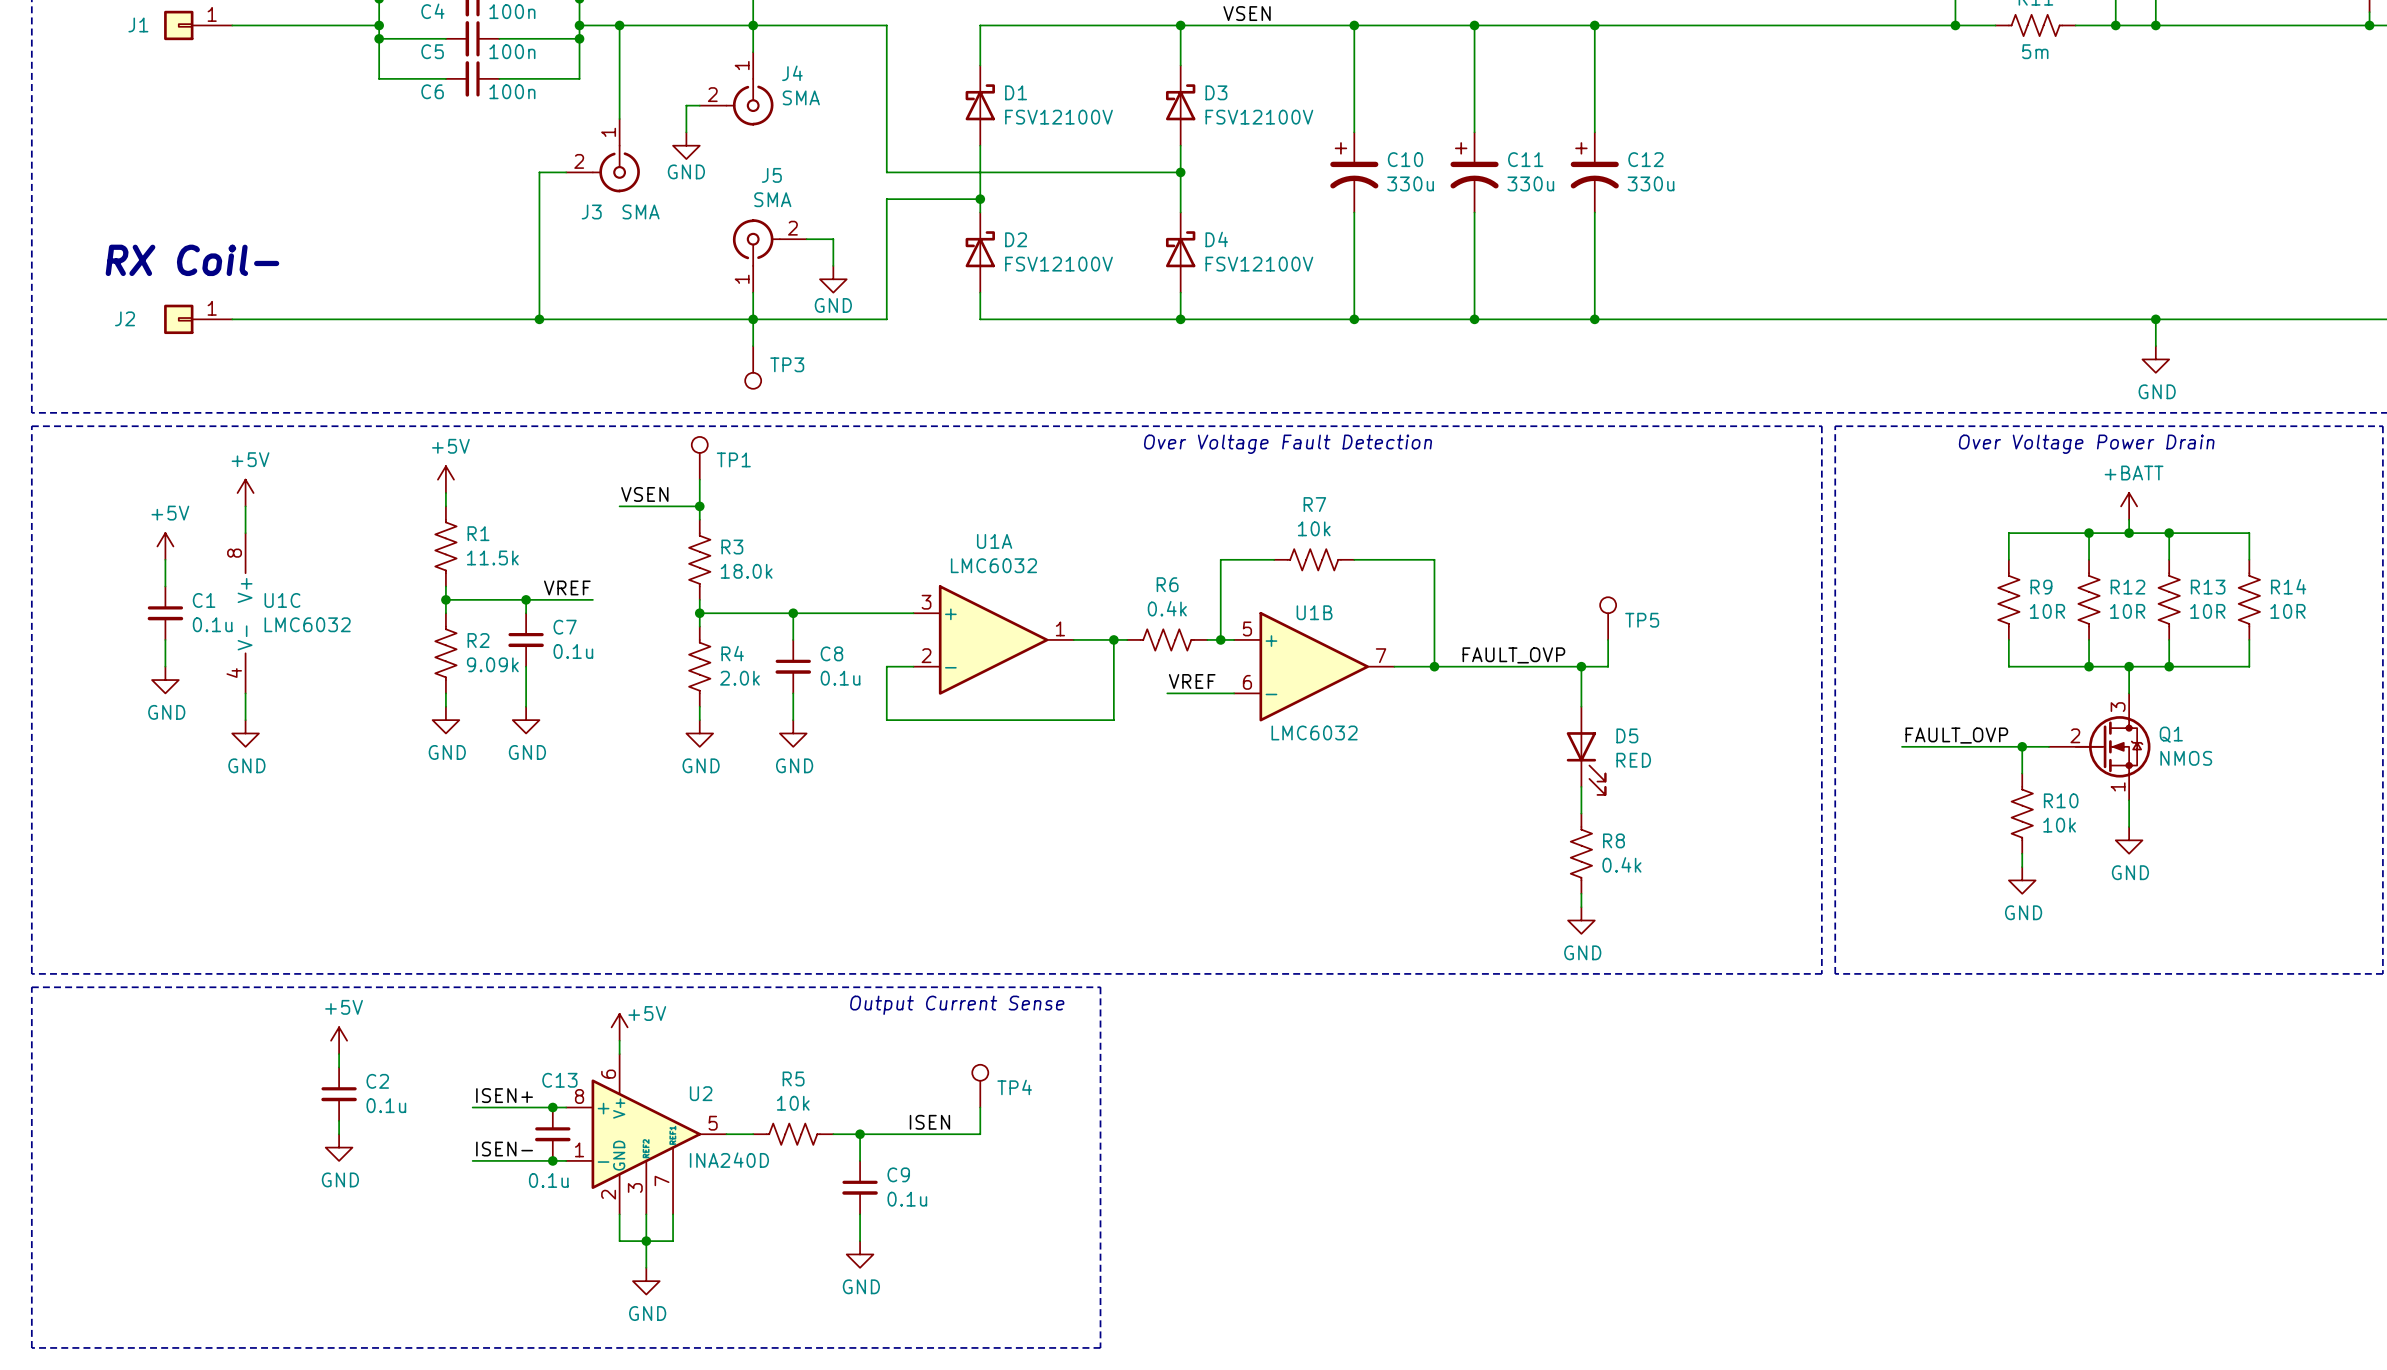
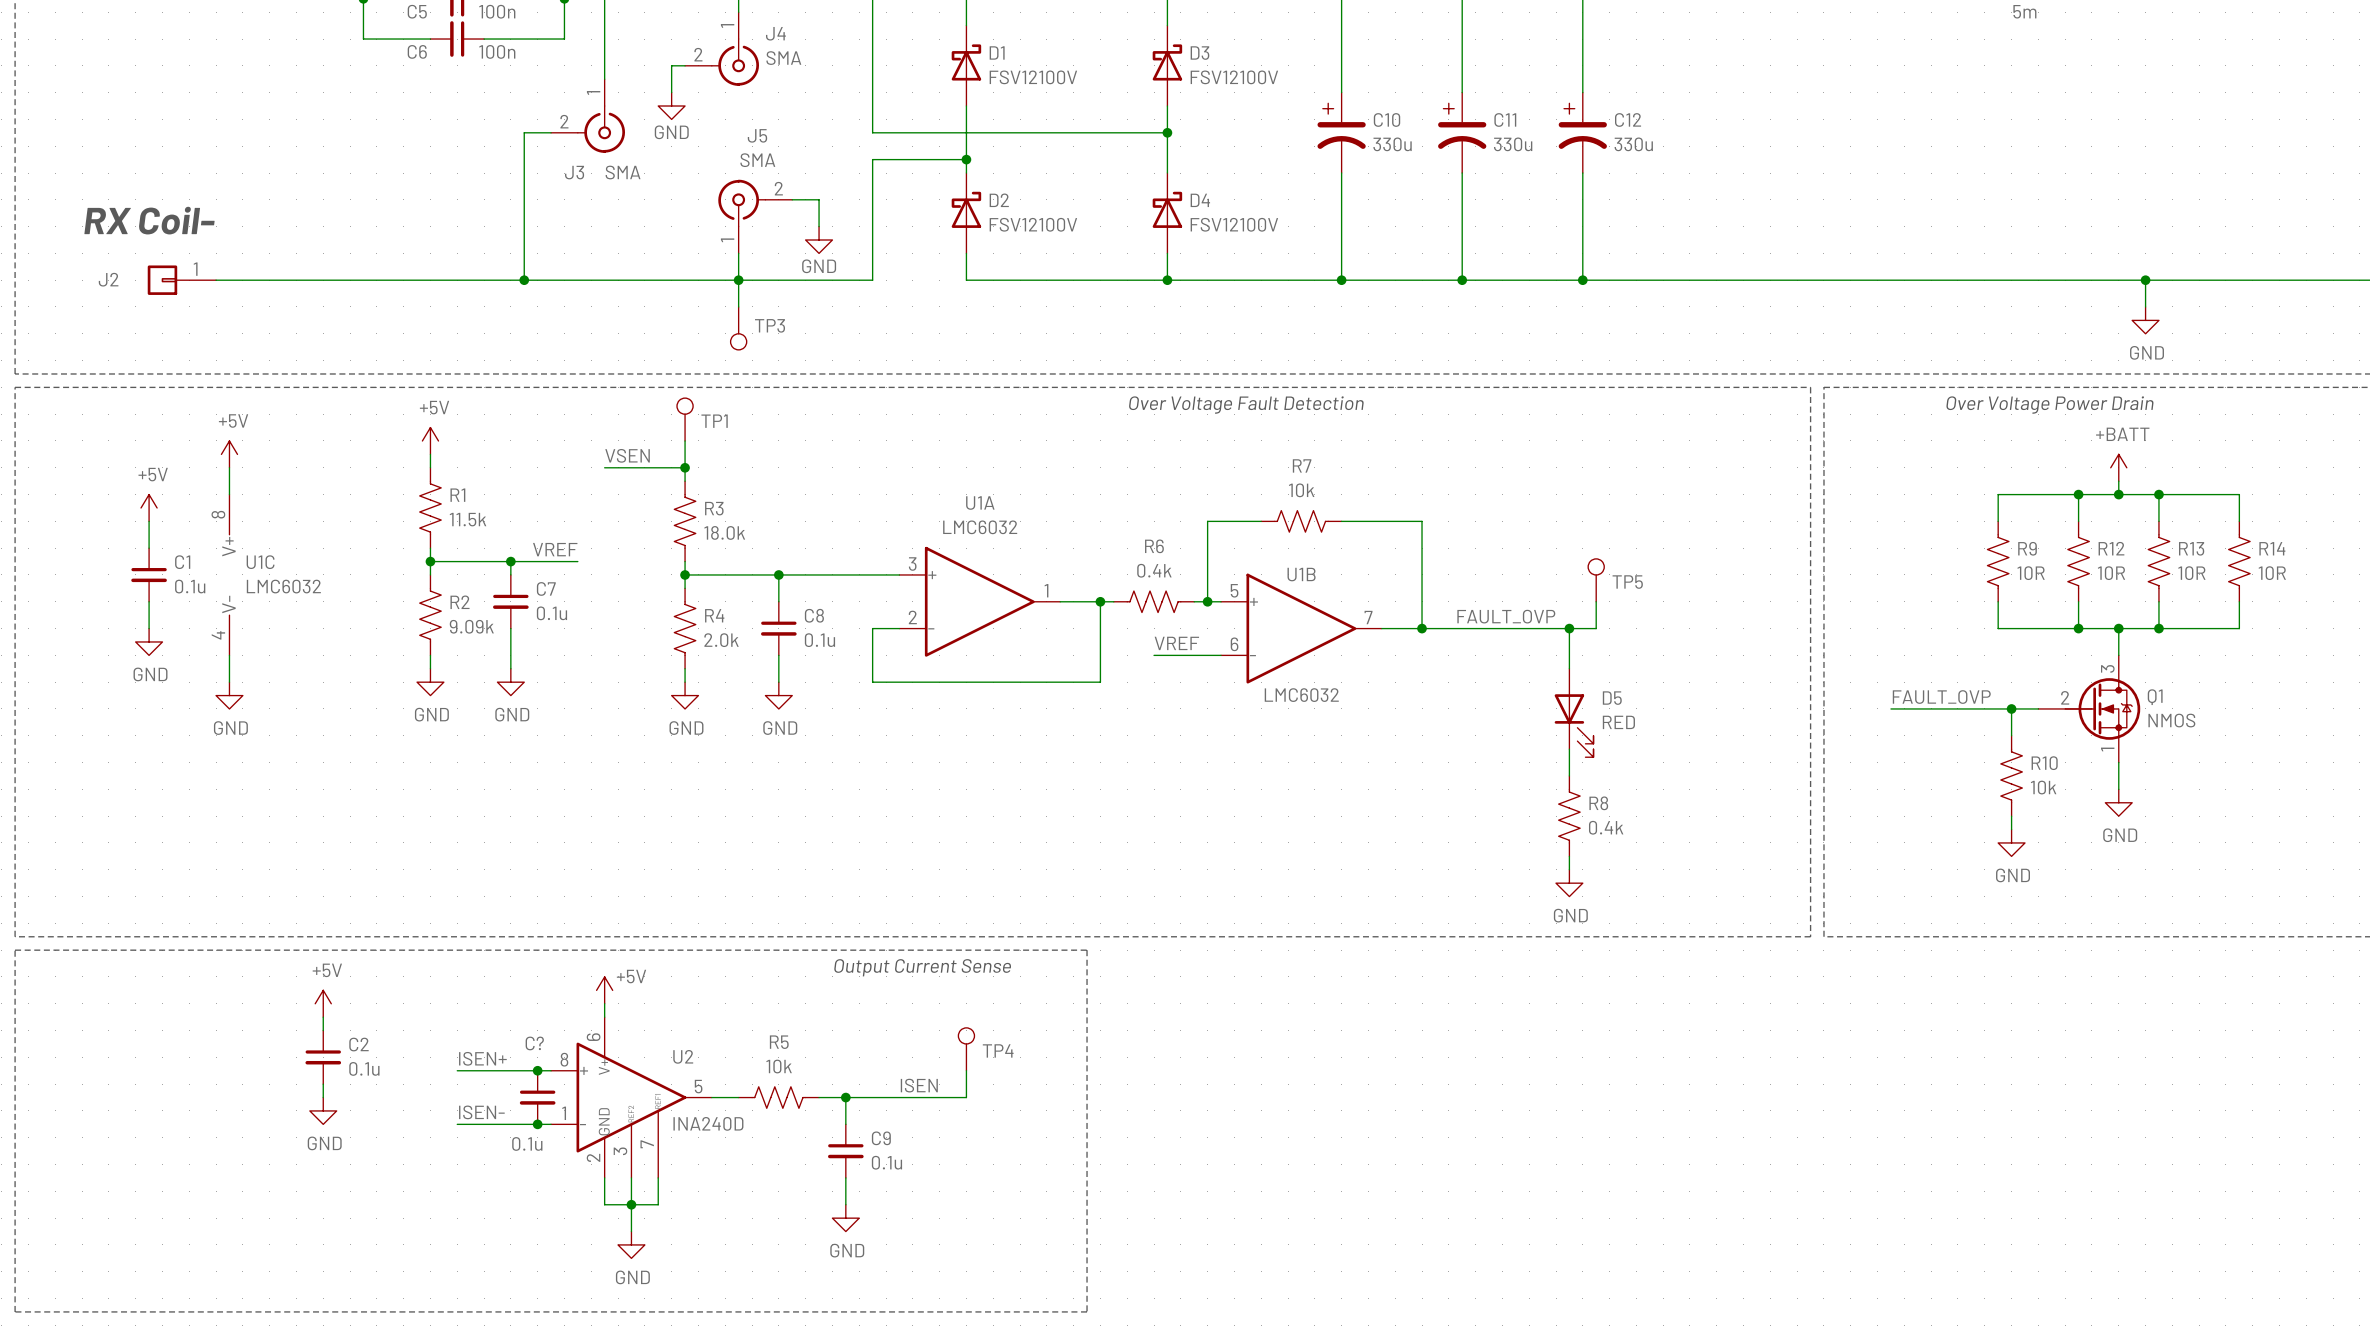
C13 name: C13 (559, 1080) -> C? (534, 1043)

